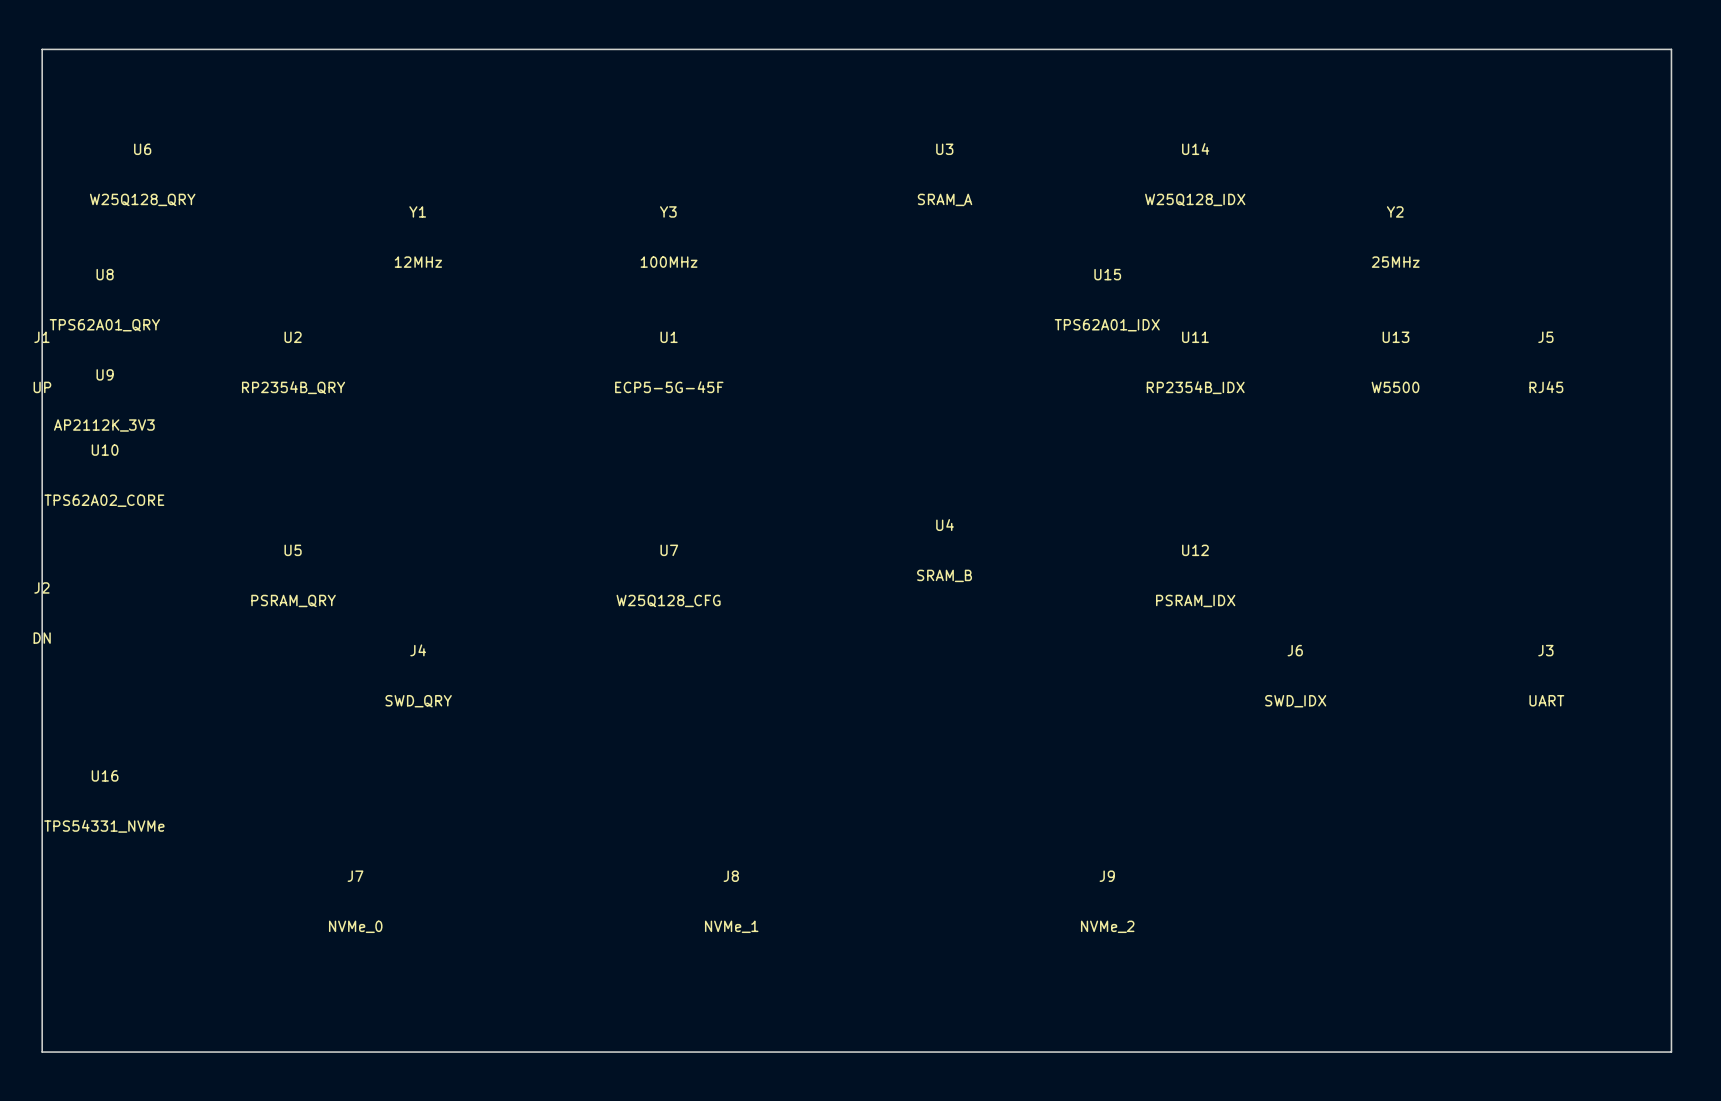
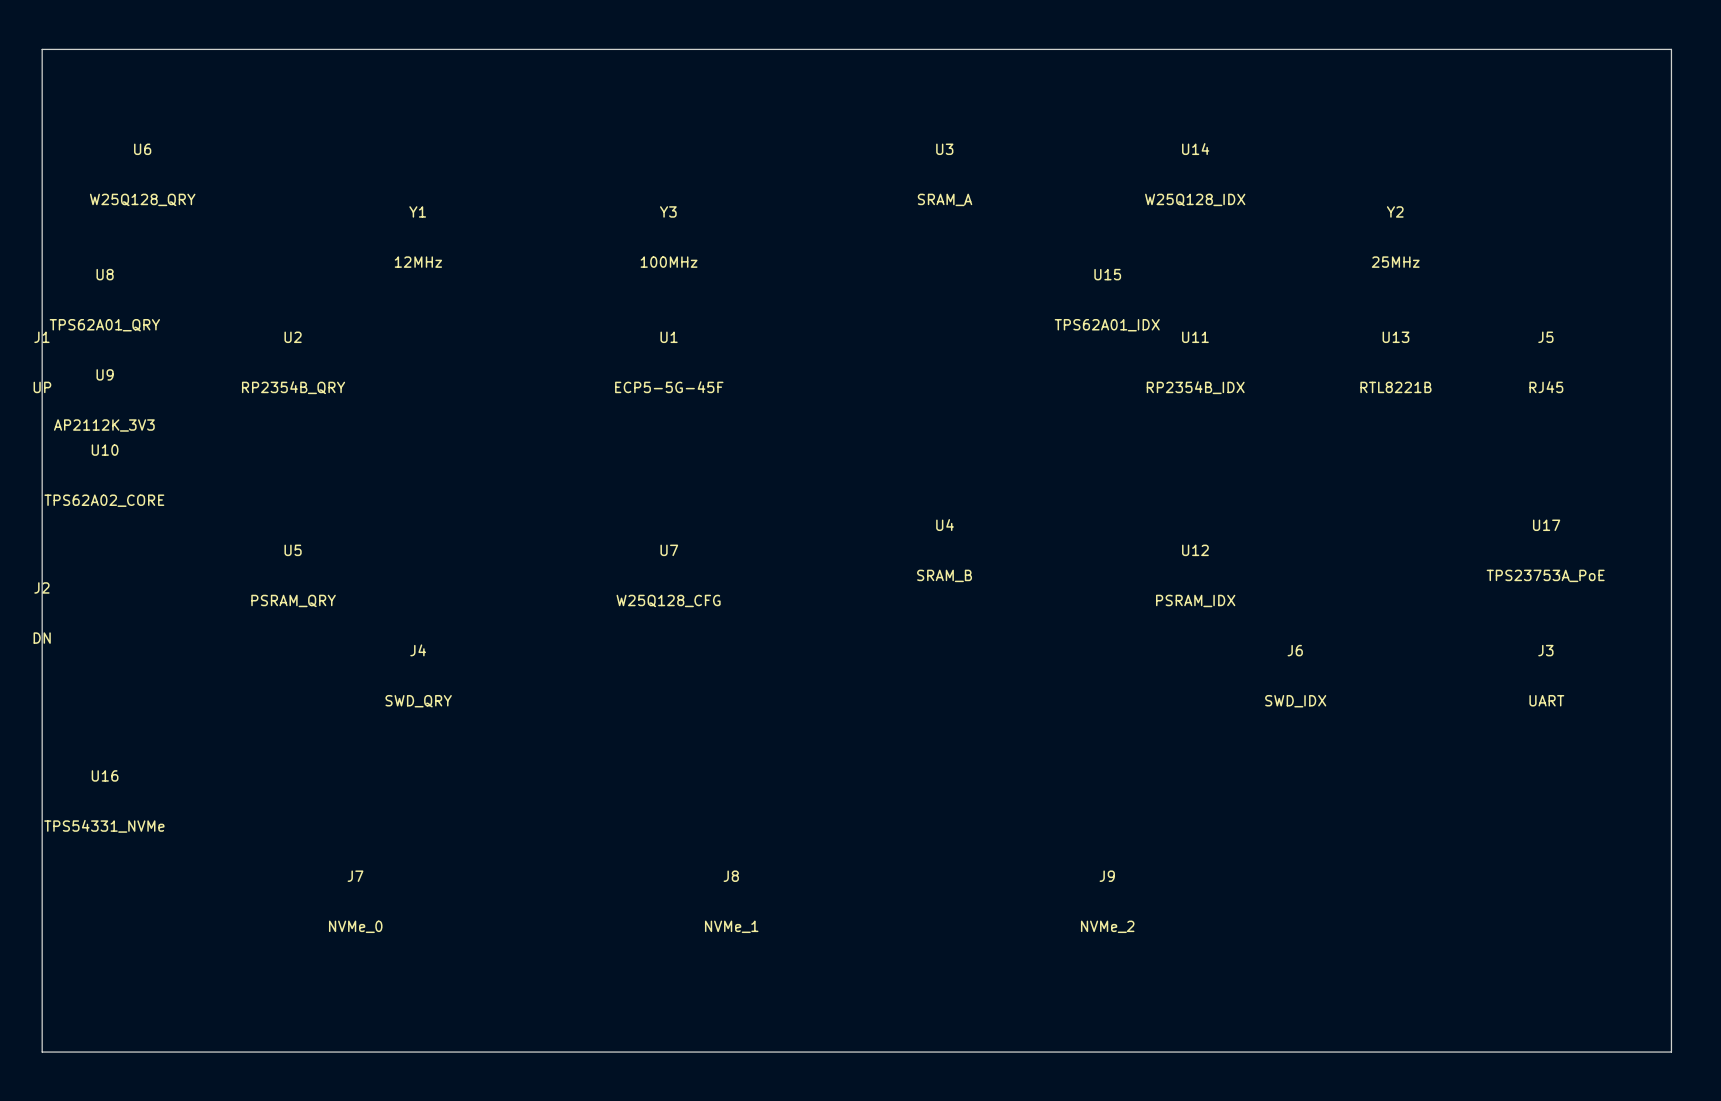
U13 value: W5500 (1395, 387) -> RTL8221B (1395, 387)
U17: none -> TPS23753A_PoE (1545, 550)

